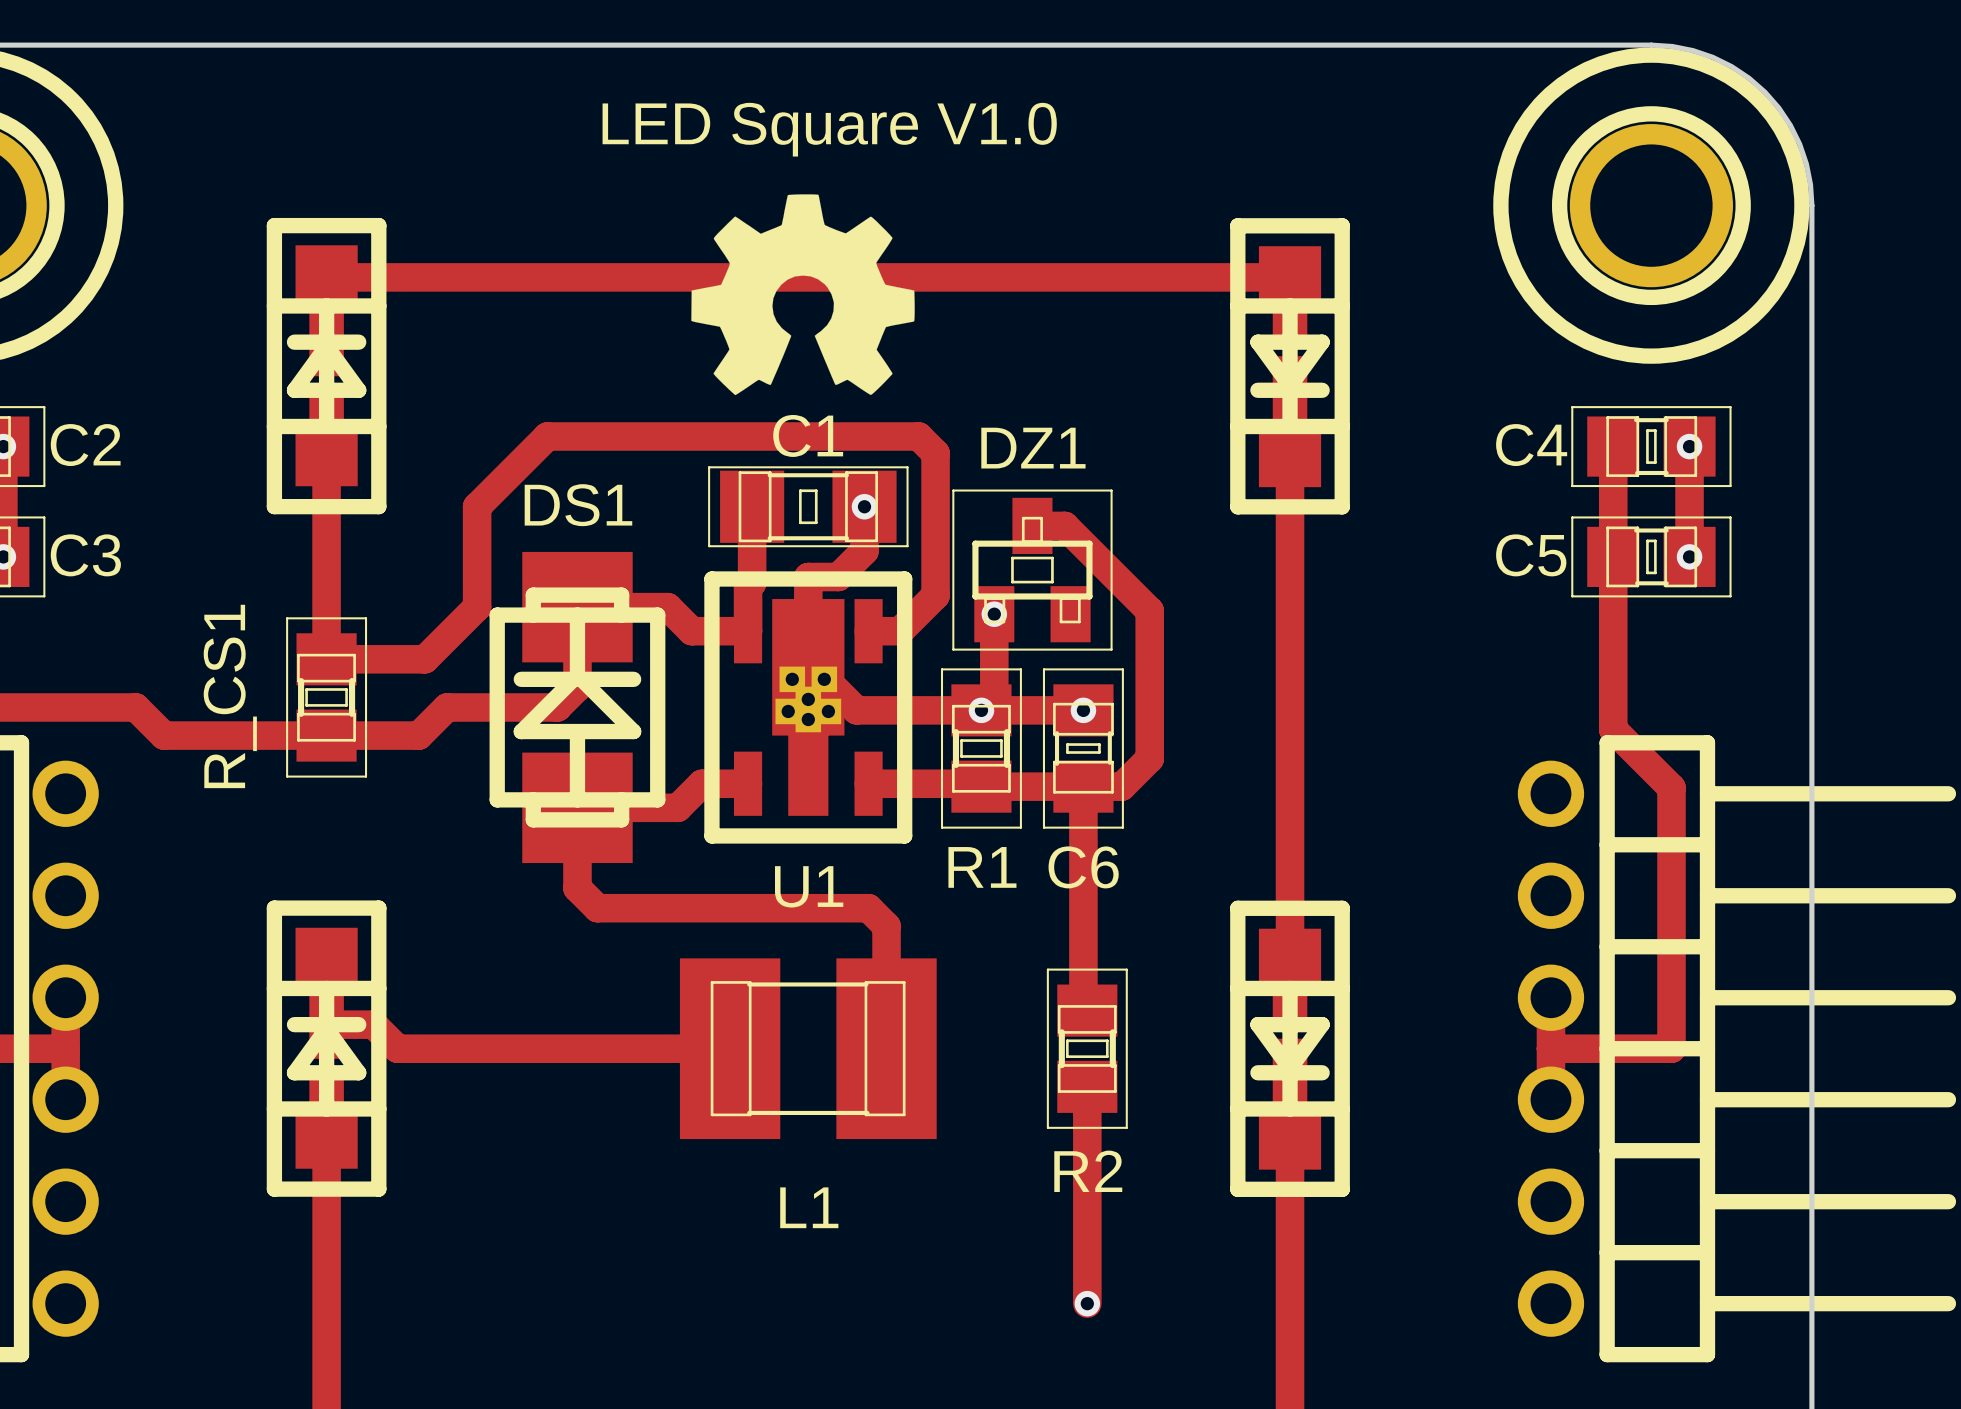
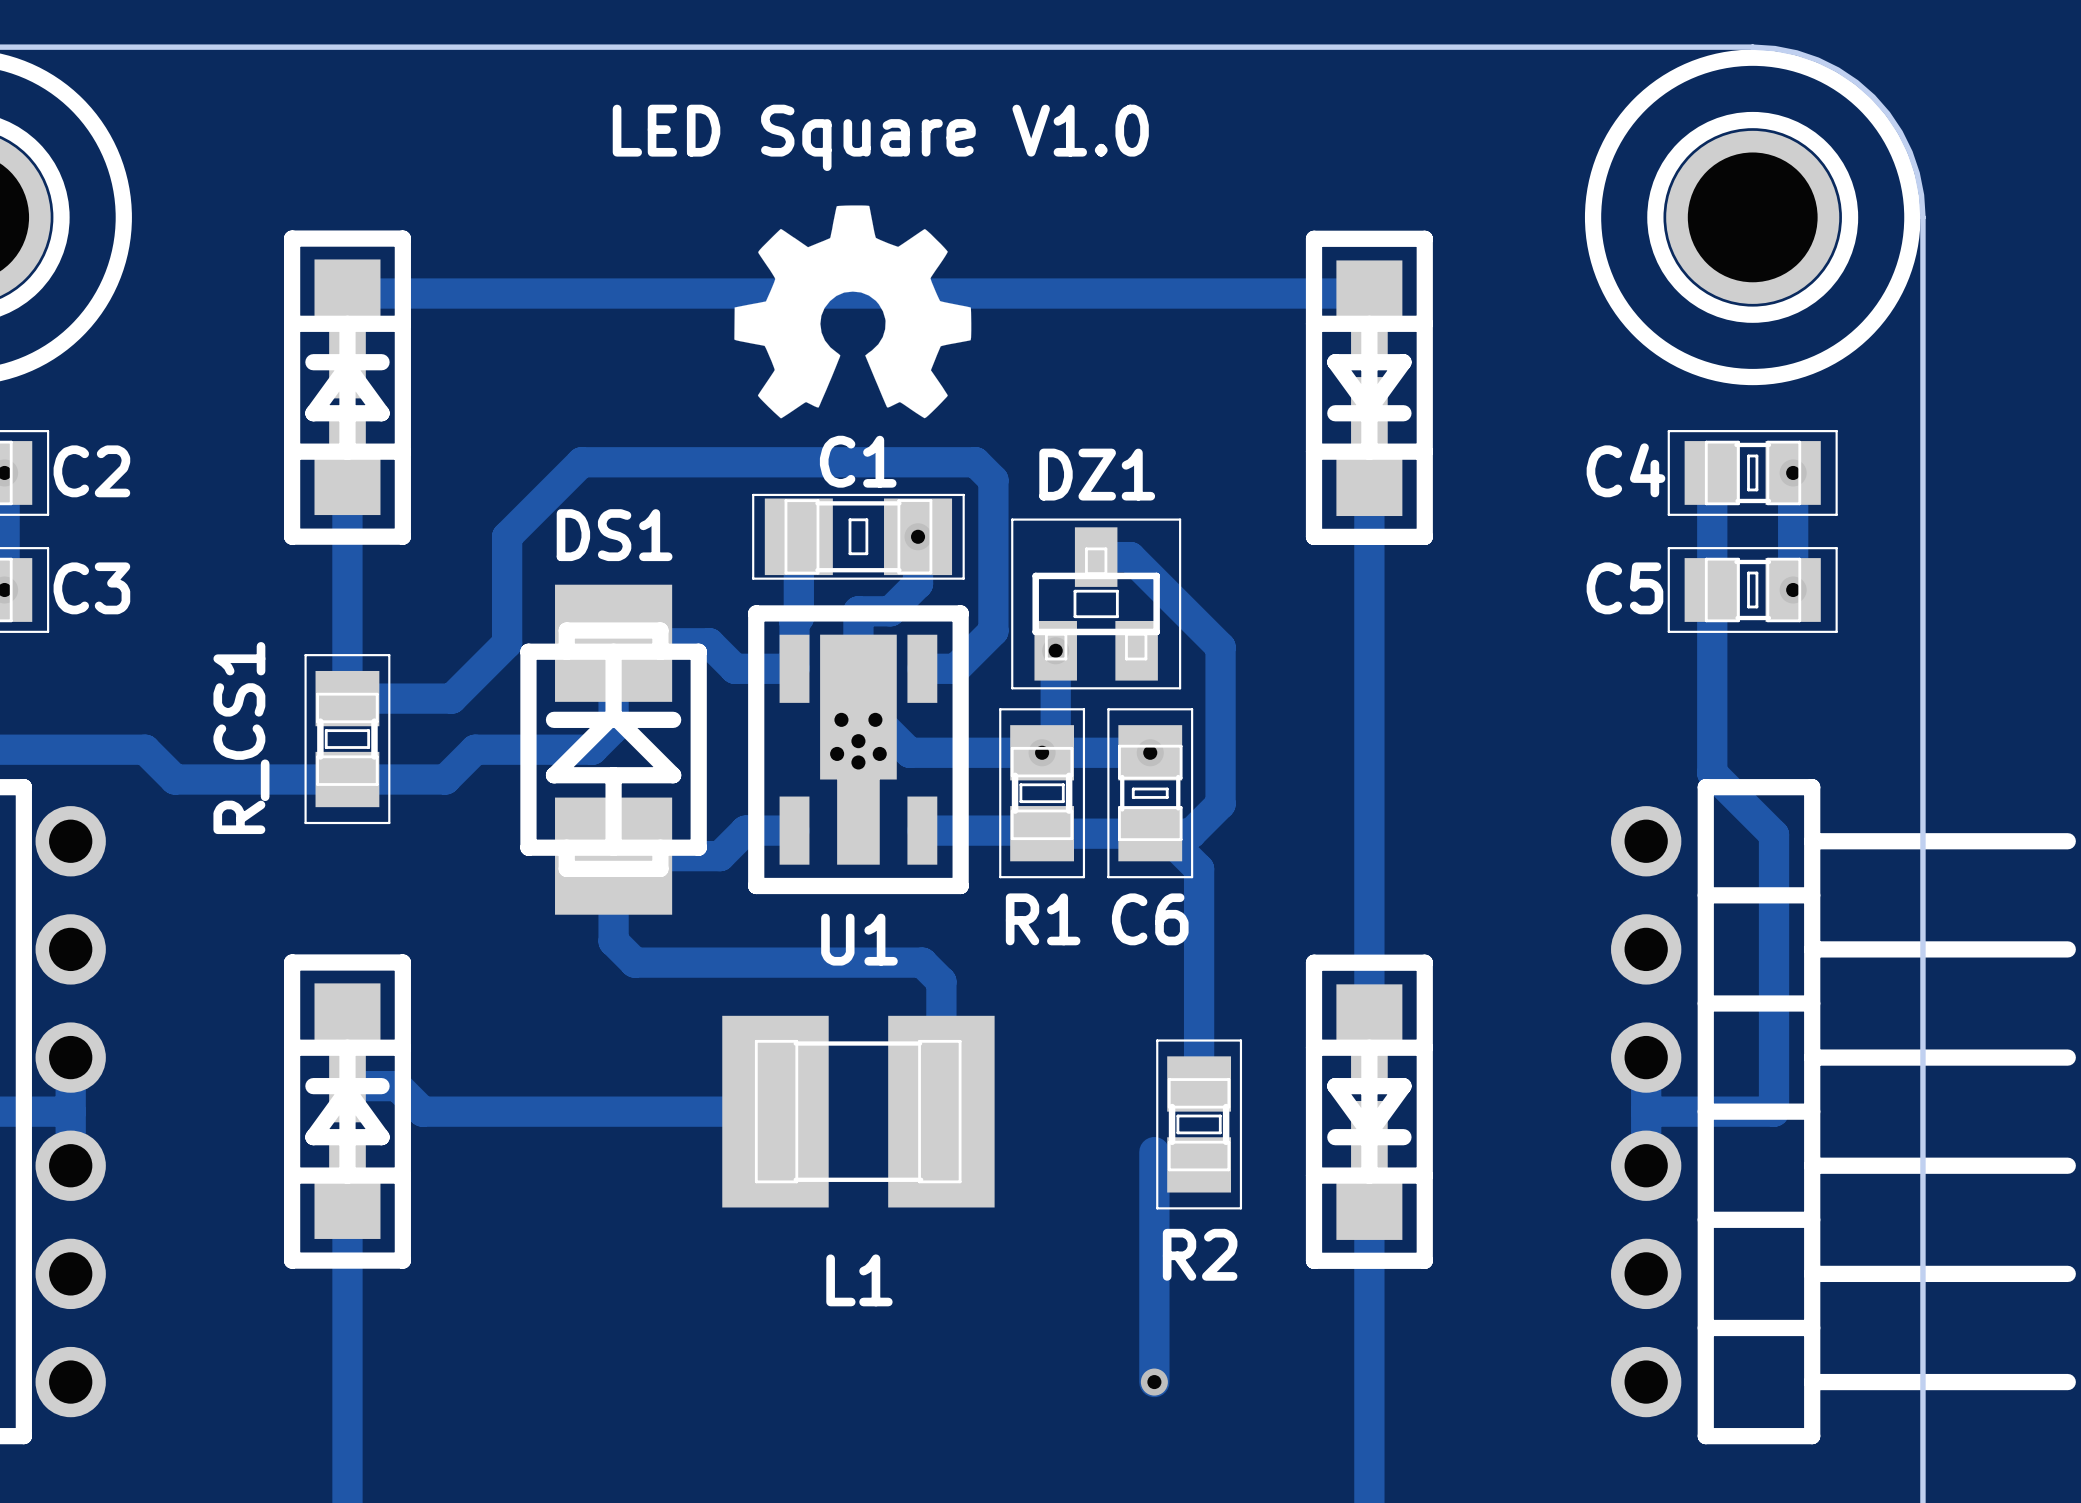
track: (1083, 786) (1083, 1006) (1087, 1010) -> none
track: none -> (1163, 833) (1199, 869) (1199, 1083)
R2 position: (1087, 1048) -> (1199, 1124)

